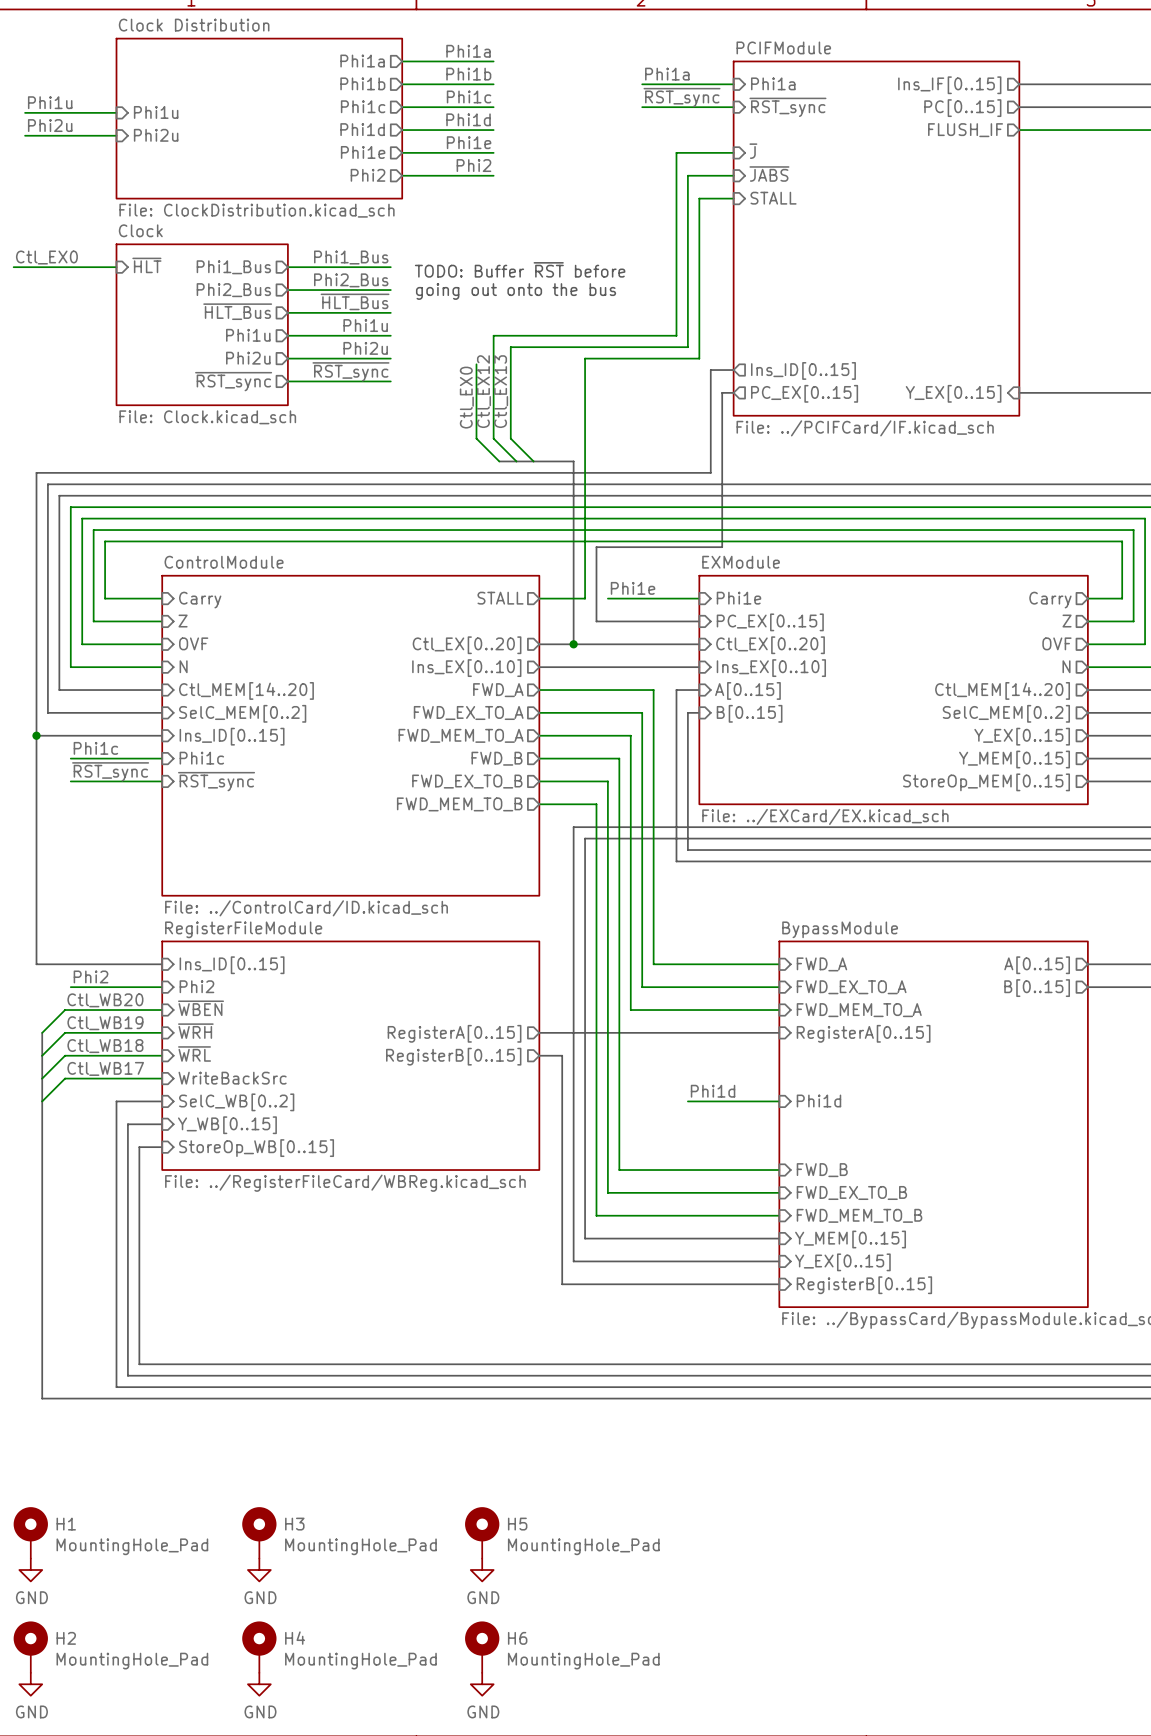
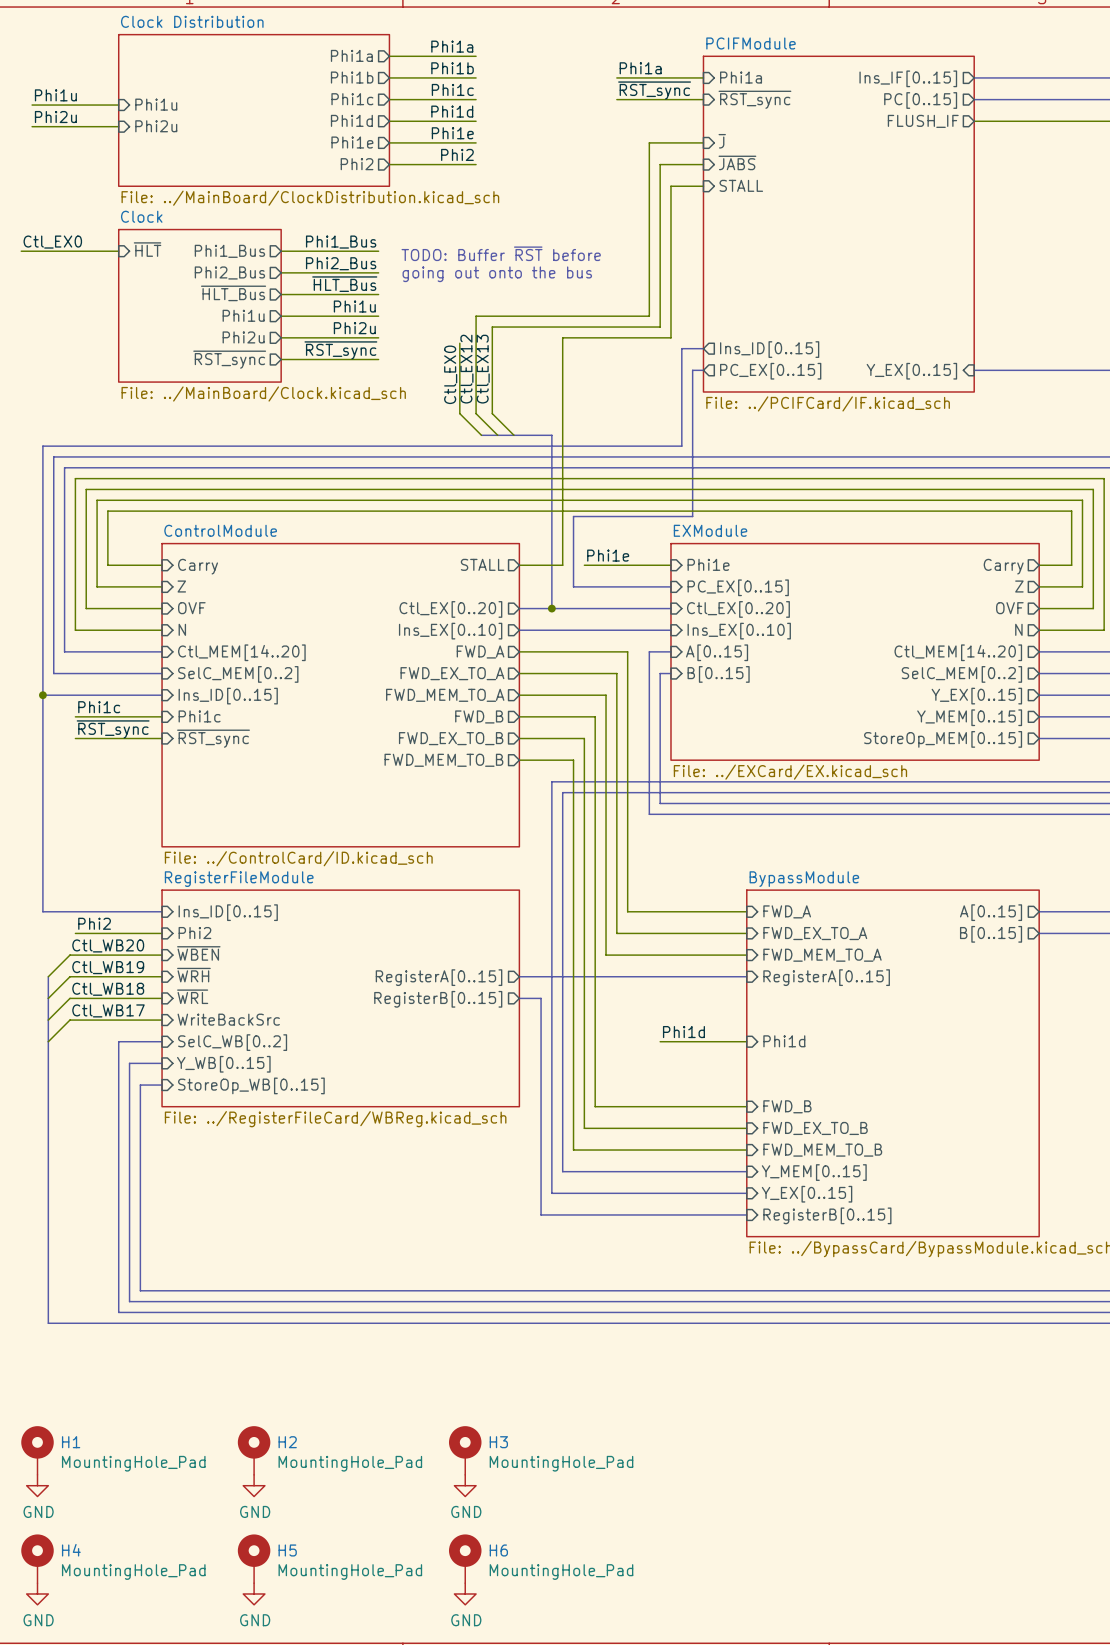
sheet Clock Distribution value: File: ClockDistribution.kicad_sch (256, 210) -> File: ../MainBoard/ClockDistribution.kicad_sch (310, 198)
sheet Clock value: File: Clock.kicad_sch (207, 417) -> File: ../MainBoard/Clock.kicad_sch (263, 394)
H3 name: H3 (294, 1524) -> H2 (287, 1442)
H5 name: H5 (517, 1524) -> H3 (498, 1442)
H2 name: H2 (66, 1638) -> H4 (71, 1550)
H4 name: H4 (295, 1638) -> H5 (287, 1550)

